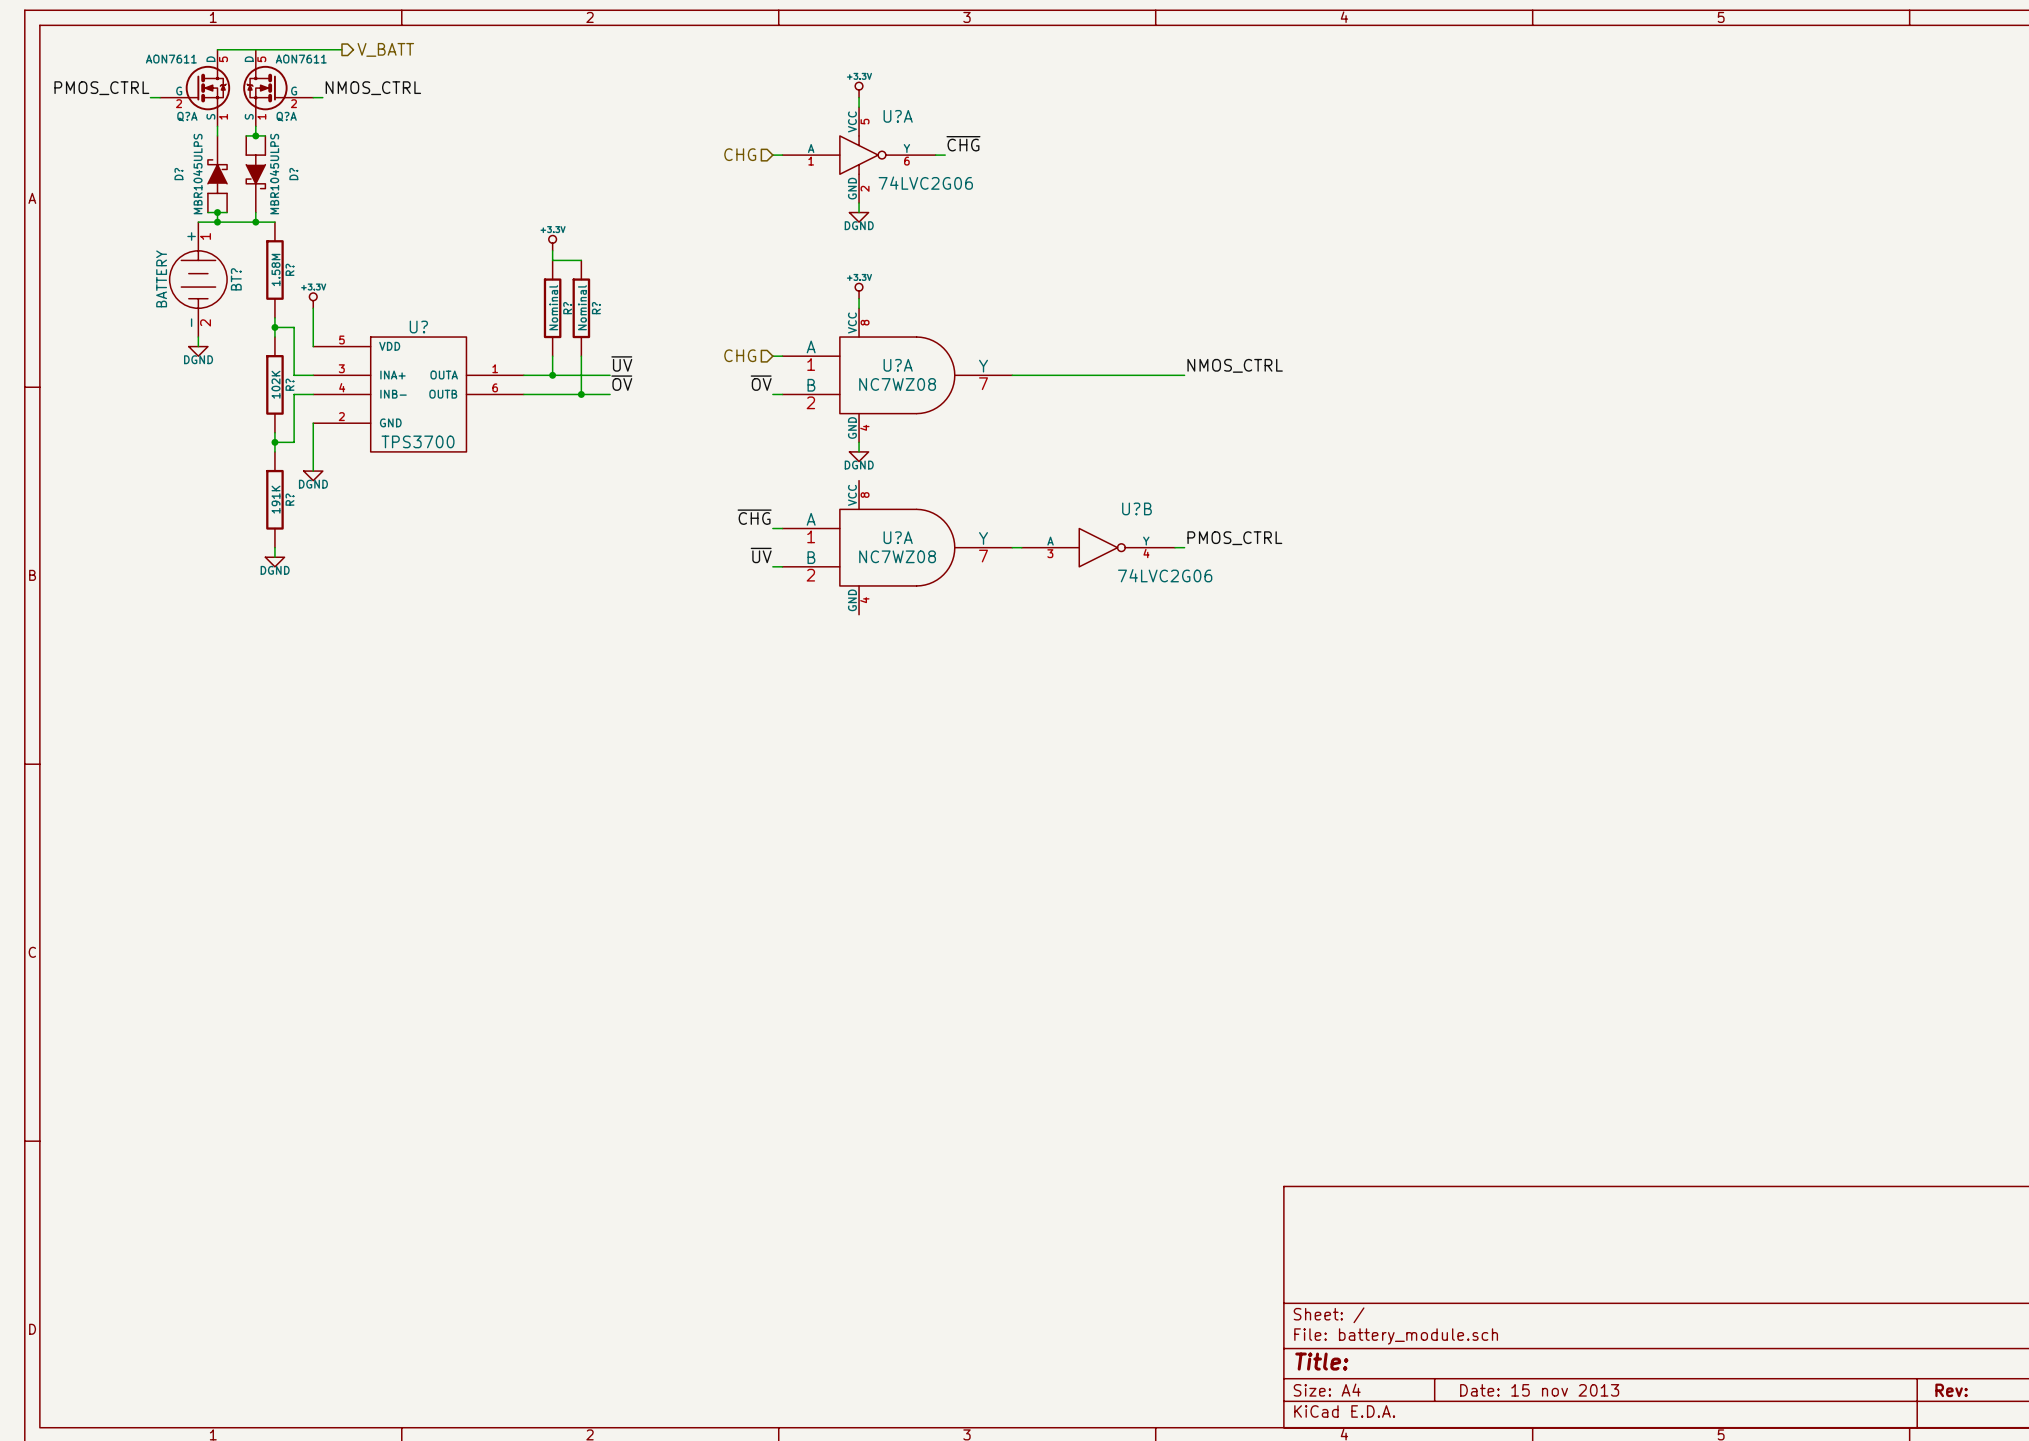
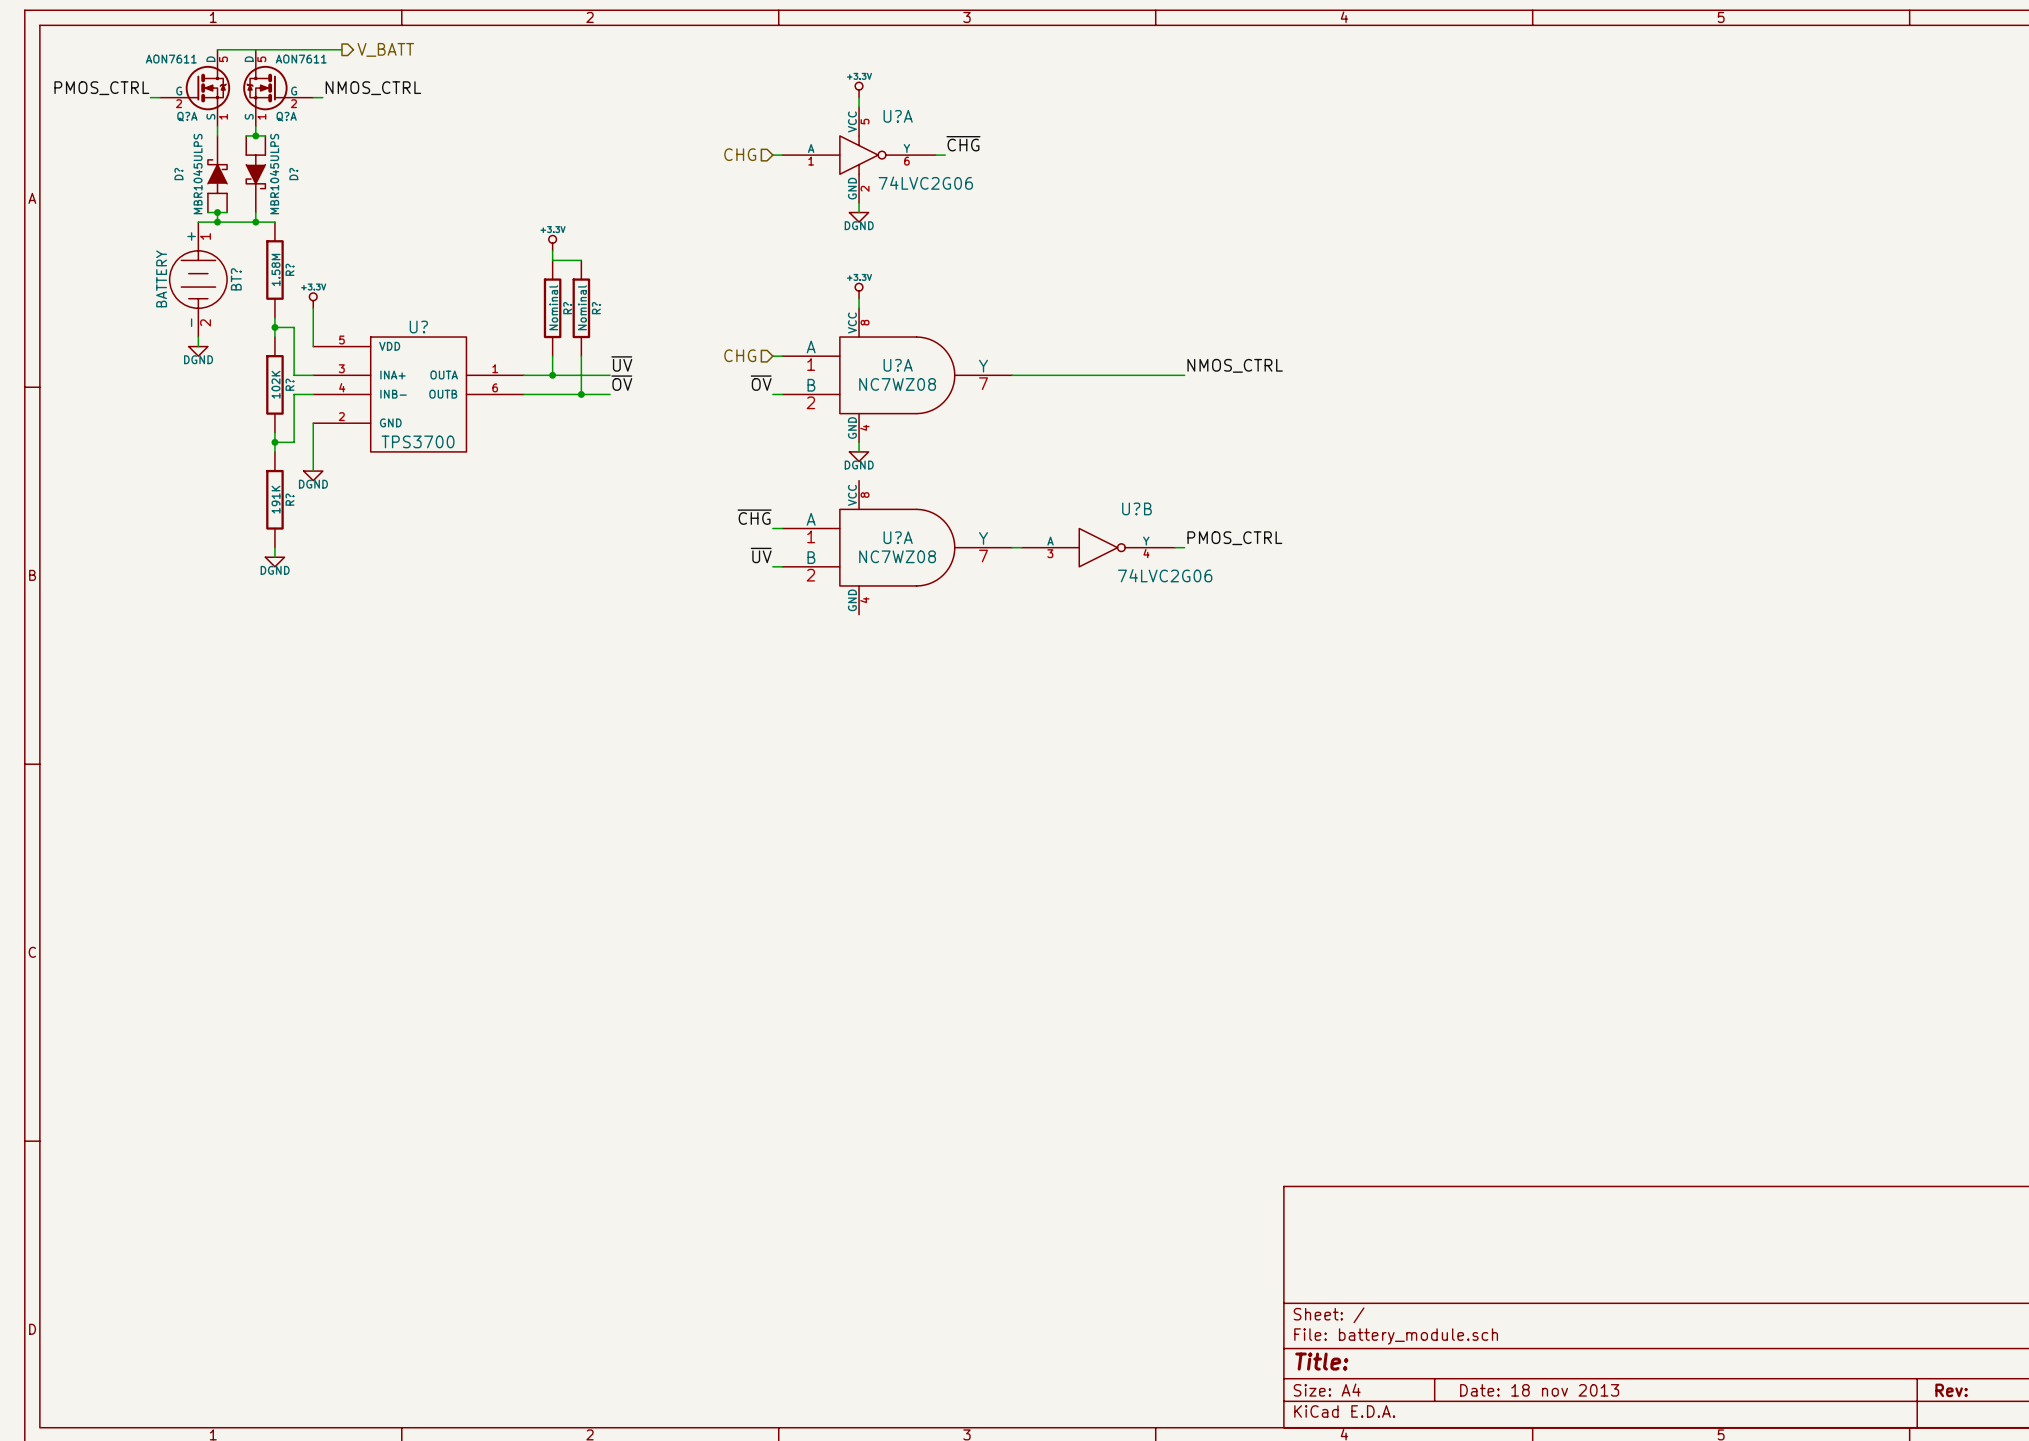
title block: Date: 15 nov 2013 (1539, 1390) -> Date: 18 nov 2013 (1539, 1390)

